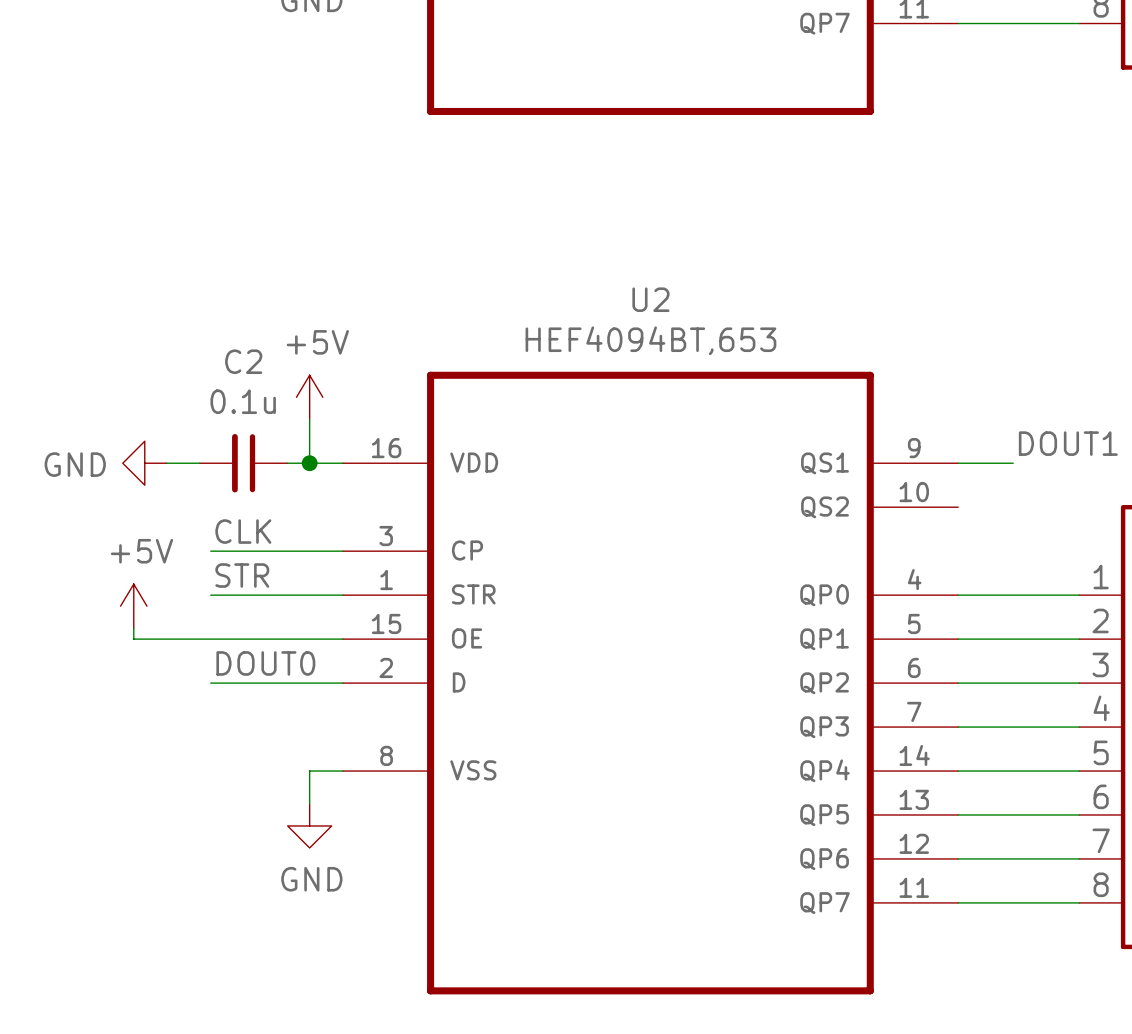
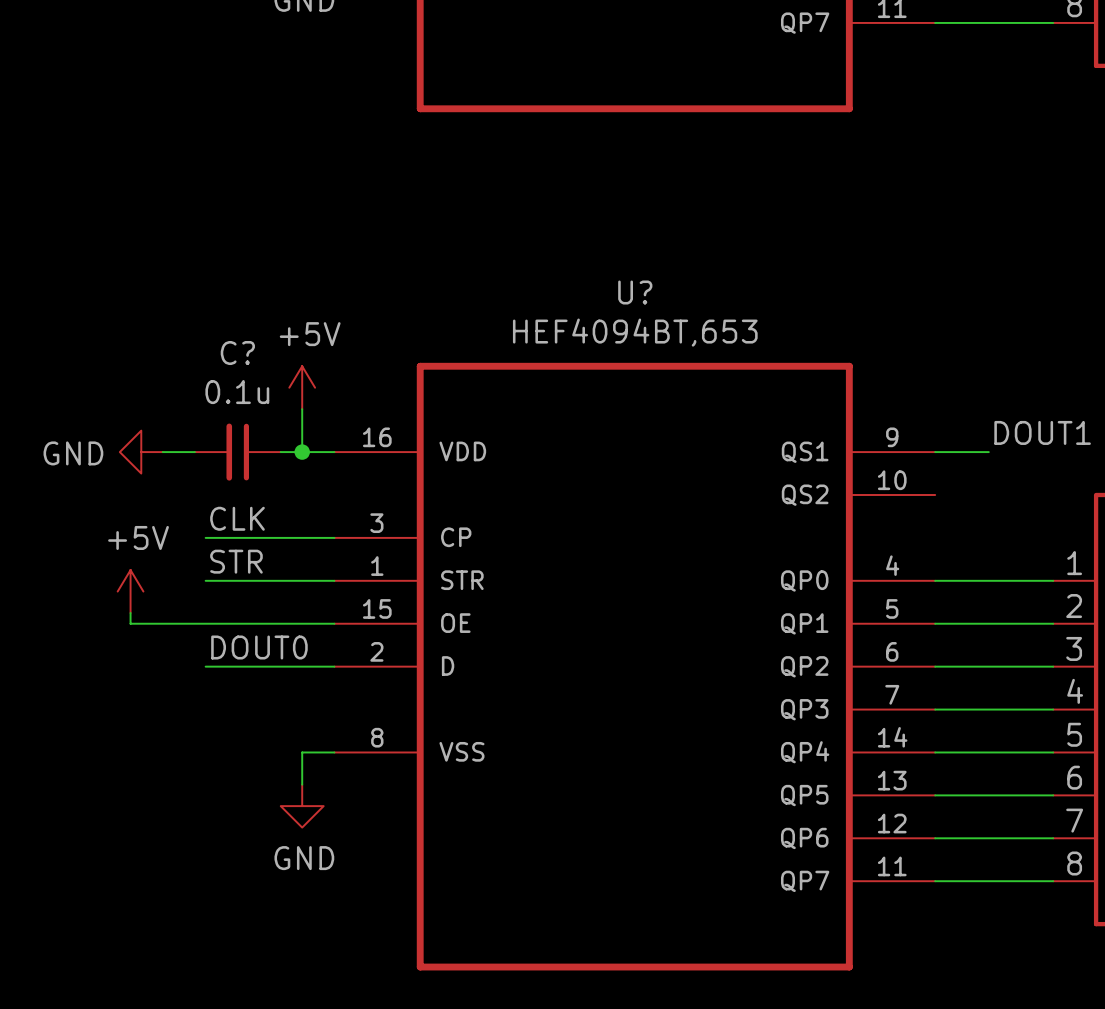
U2 name: U2 (650, 299) -> U? (635, 292)
C2 name: C2 (243, 361) -> C? (237, 353)

